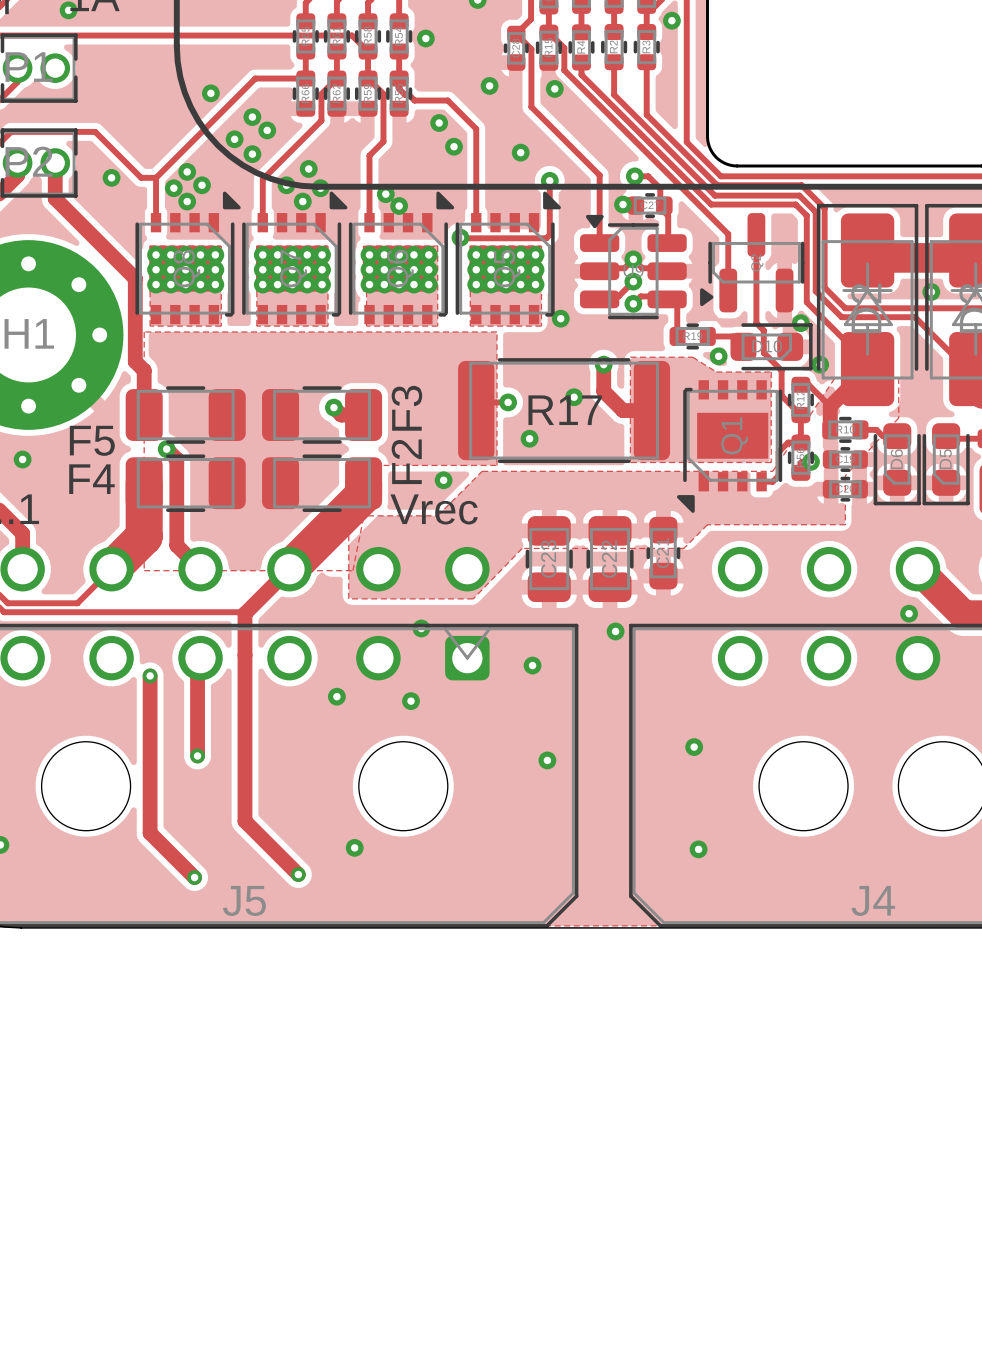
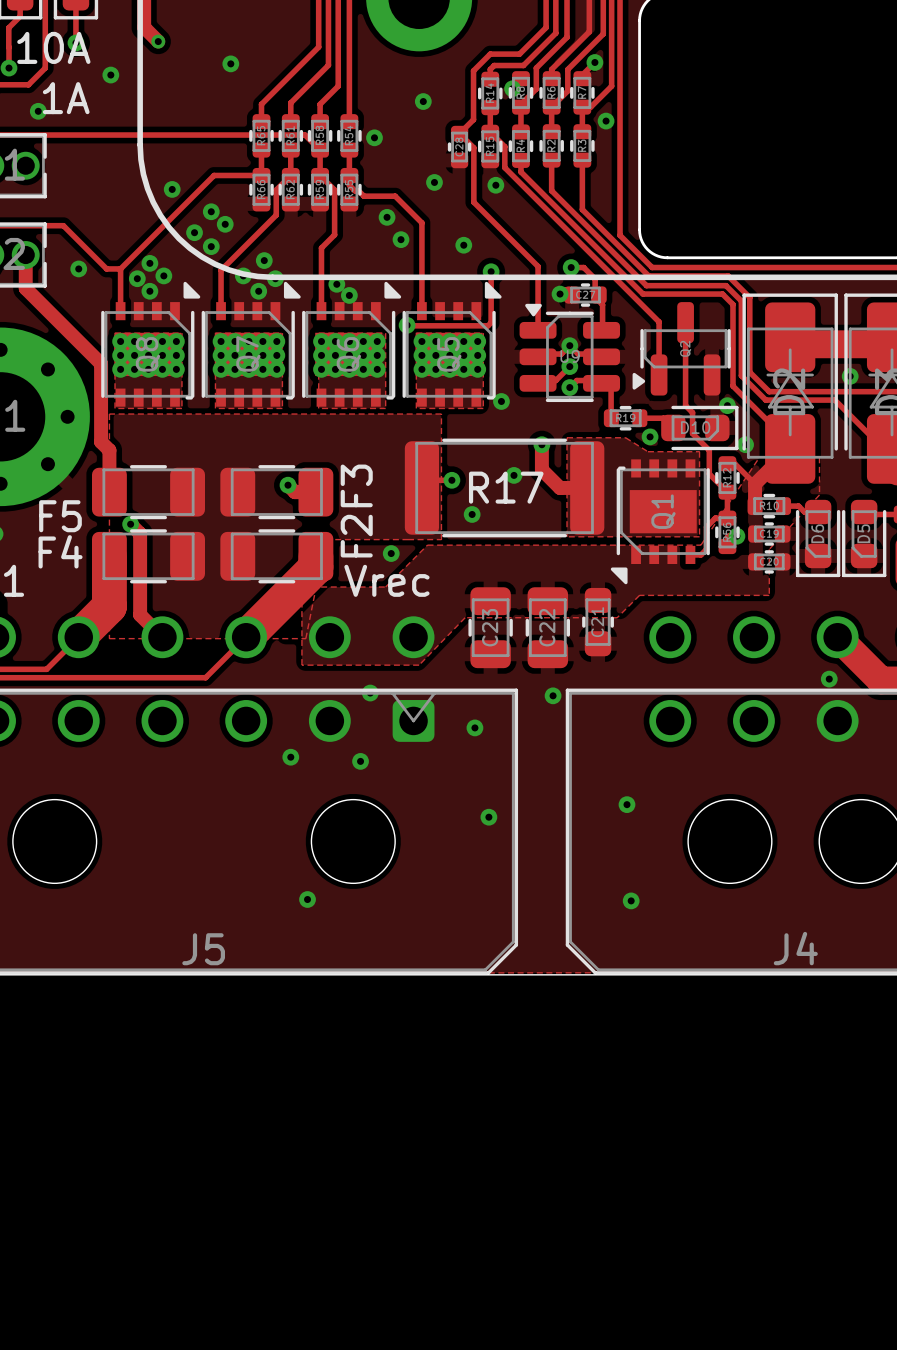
track: (289, 569) (244, 613) (244, 821) (298, 874) -> none
track: (197, 661) (197, 755) -> none
track: (150, 675) (150, 833) (194, 877) -> none
via: (150, 675) -> none
via: (197, 755) -> none
via: (298, 874) -> none
via: (194, 877) -> none

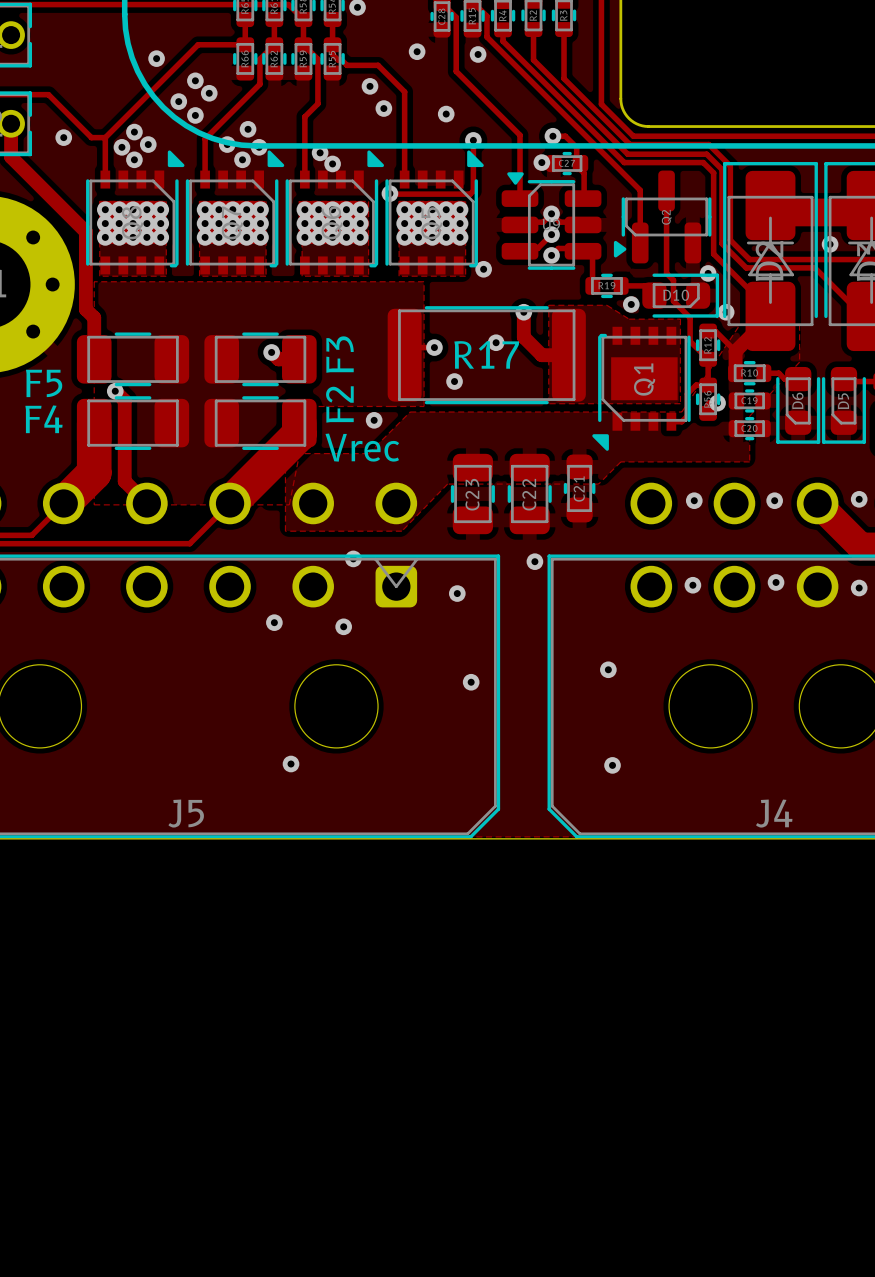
via: none -> (859, 499)
via: none -> (694, 500)
via: none -> (774, 500)
via: (829, 679) -> none
via: none -> (776, 582)
via: none -> (692, 585)
via: none -> (859, 588)

